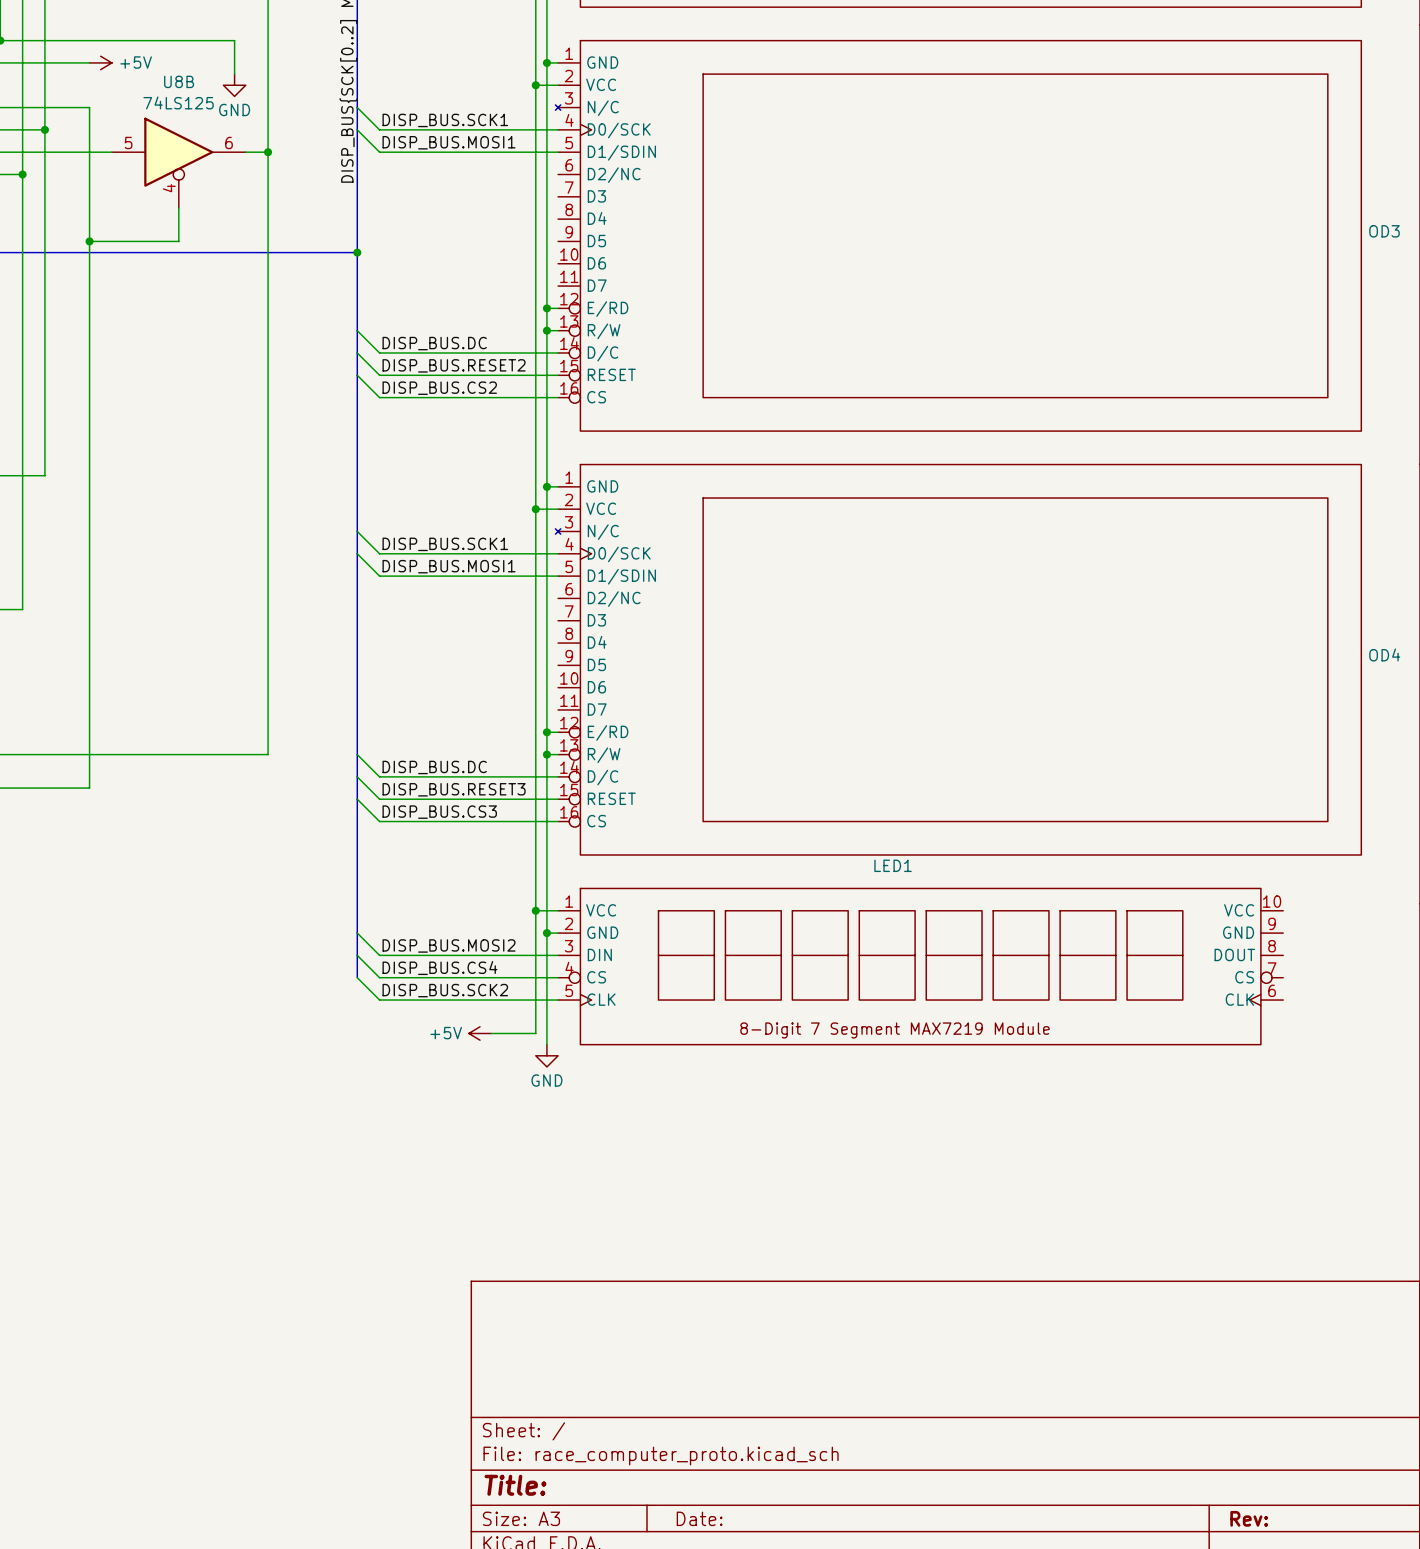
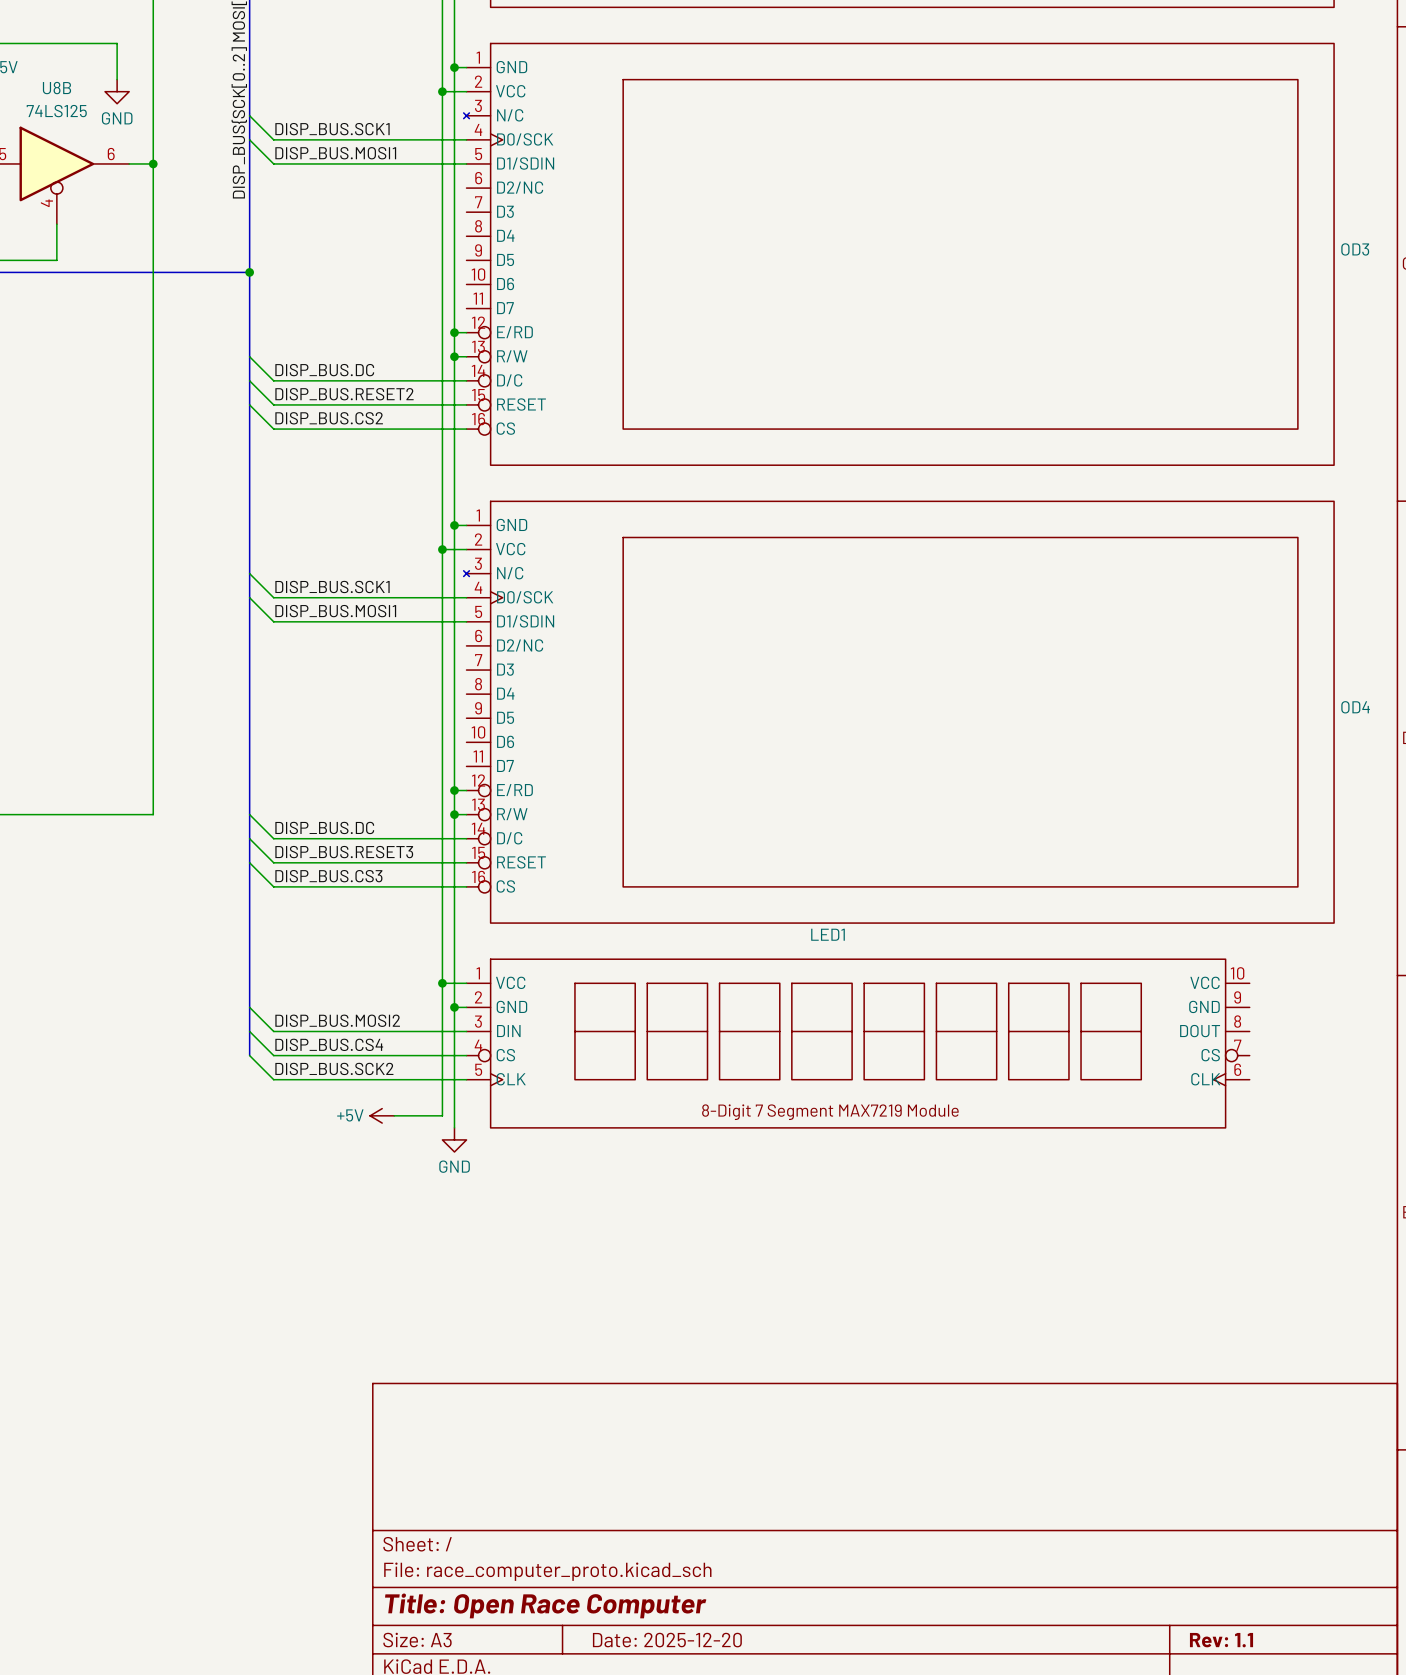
title block: Title: (515, 1485) -> Title: Open Race Computer (545, 1605)
title block: Date: (699, 1518) -> Date: 2025-12-20 (667, 1640)
title block: Rev: (1249, 1518) -> Rev: 1.1 (1221, 1640)

